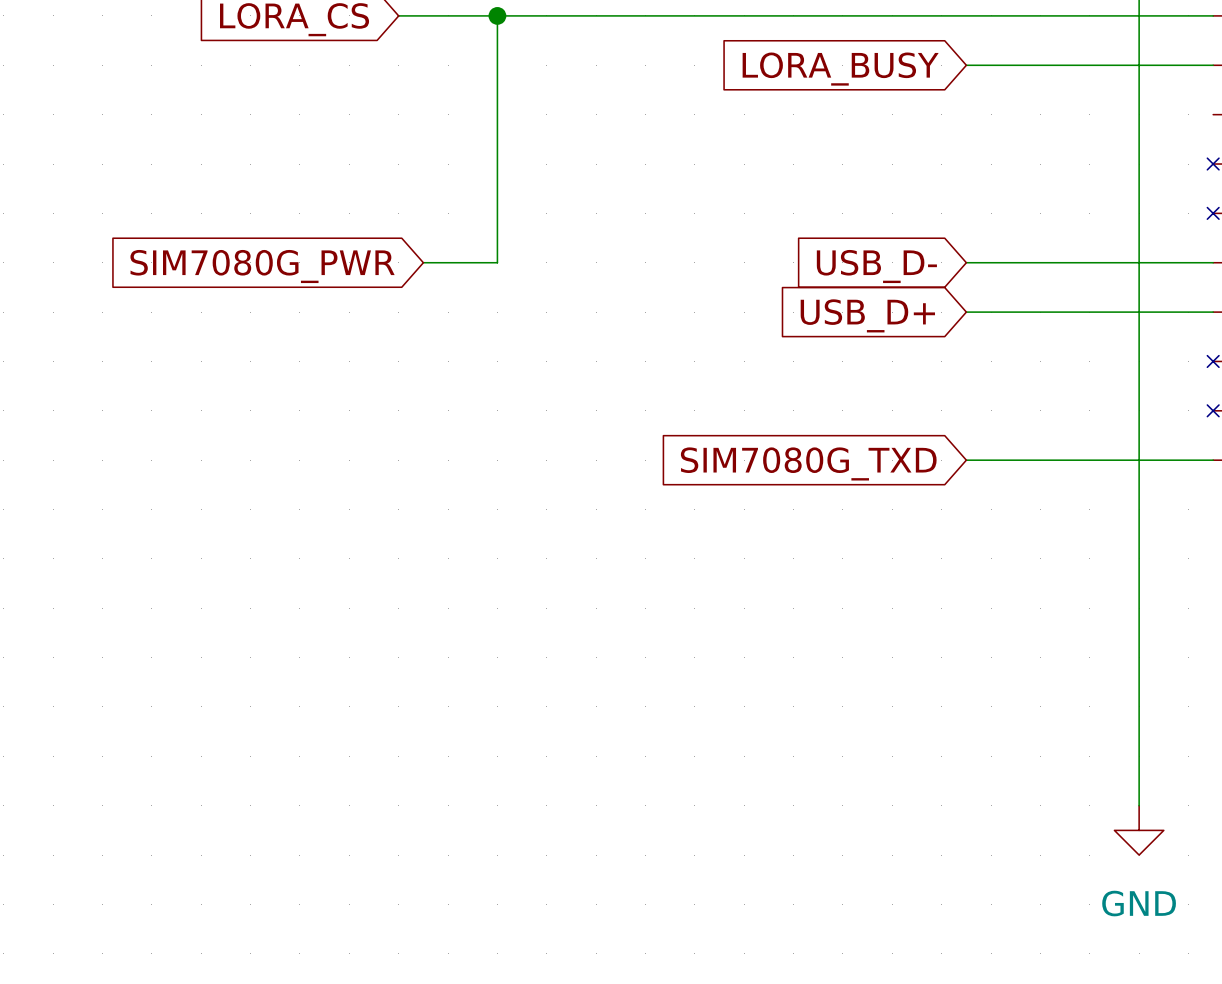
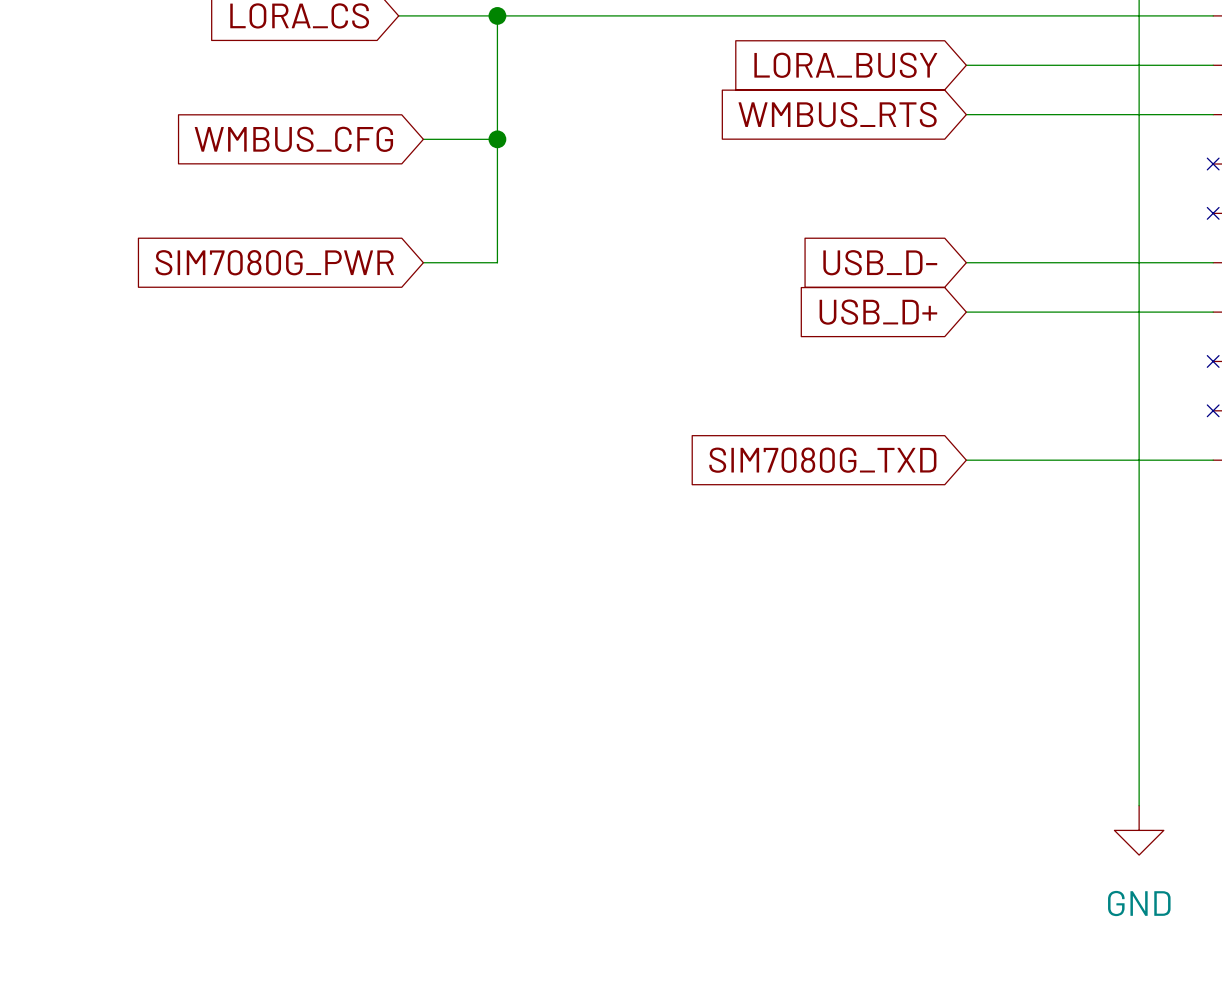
wire: none -> (966, 114) (1213, 114)
global label: none -> WMBUS_RTS (837, 114)
wire: none -> (423, 139) (497, 139)
junction: none -> (497, 139)
global label: none -> WMBUS_CFG (293, 139)

